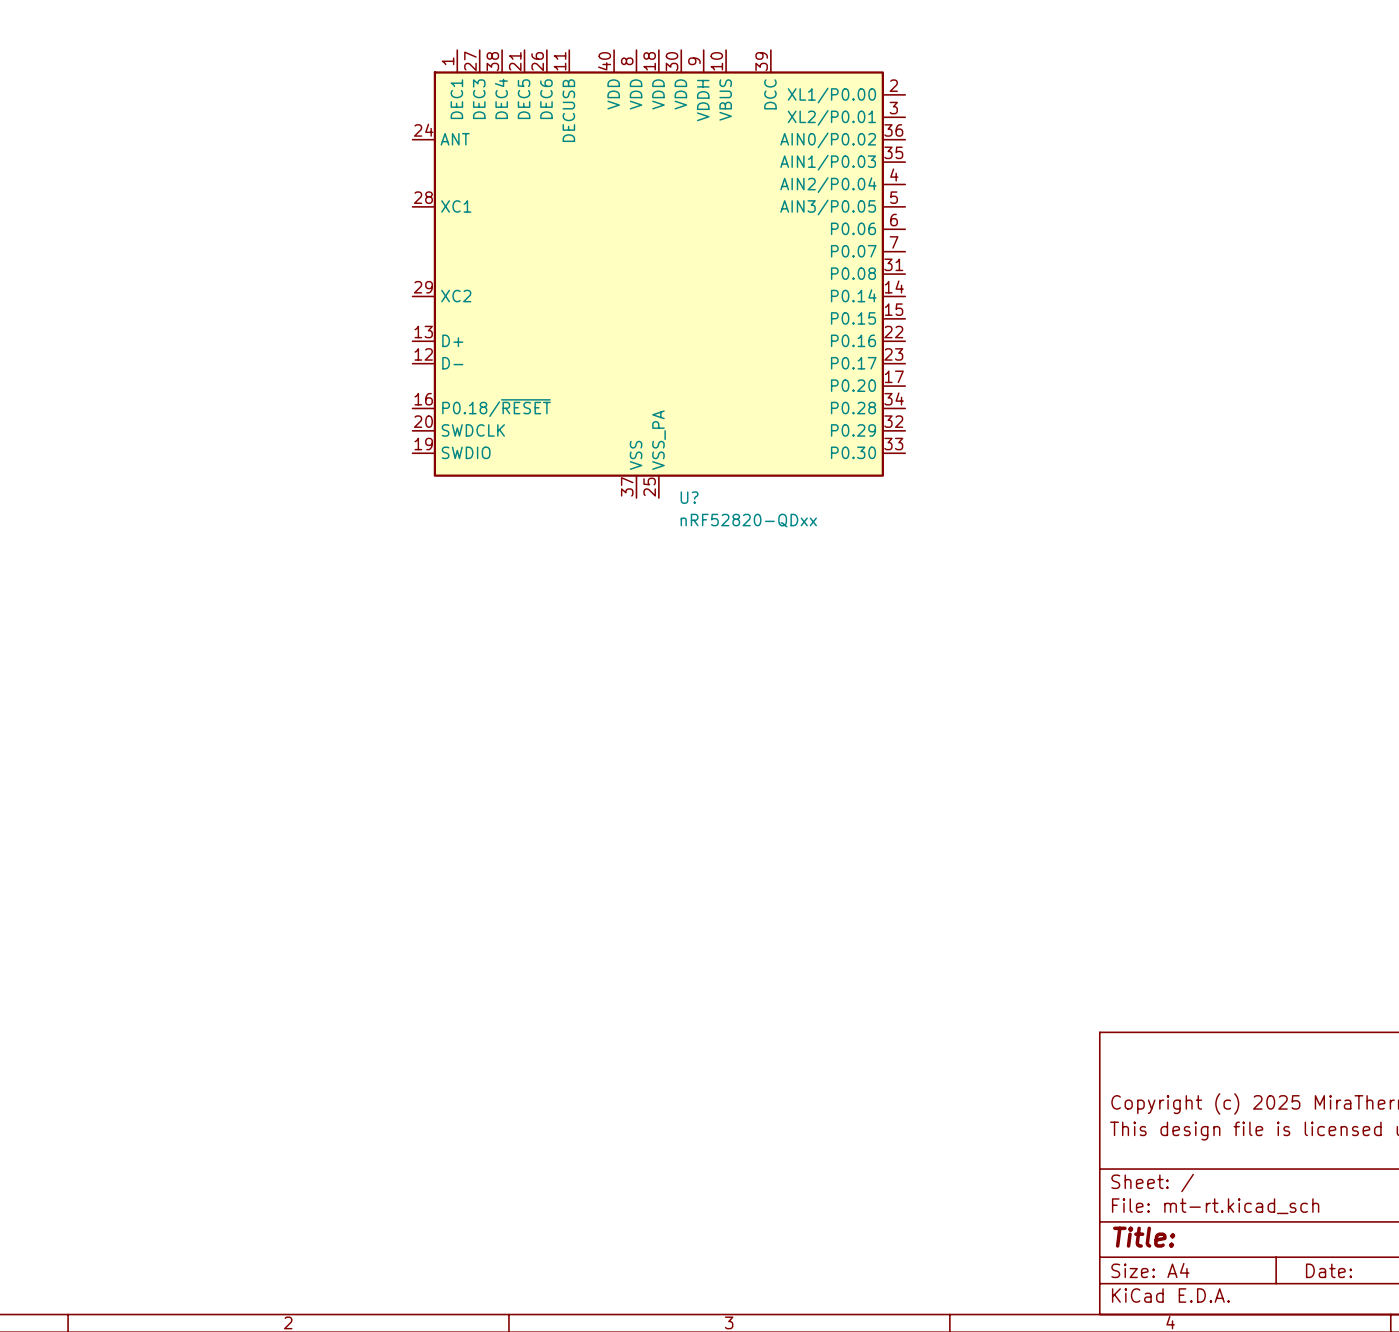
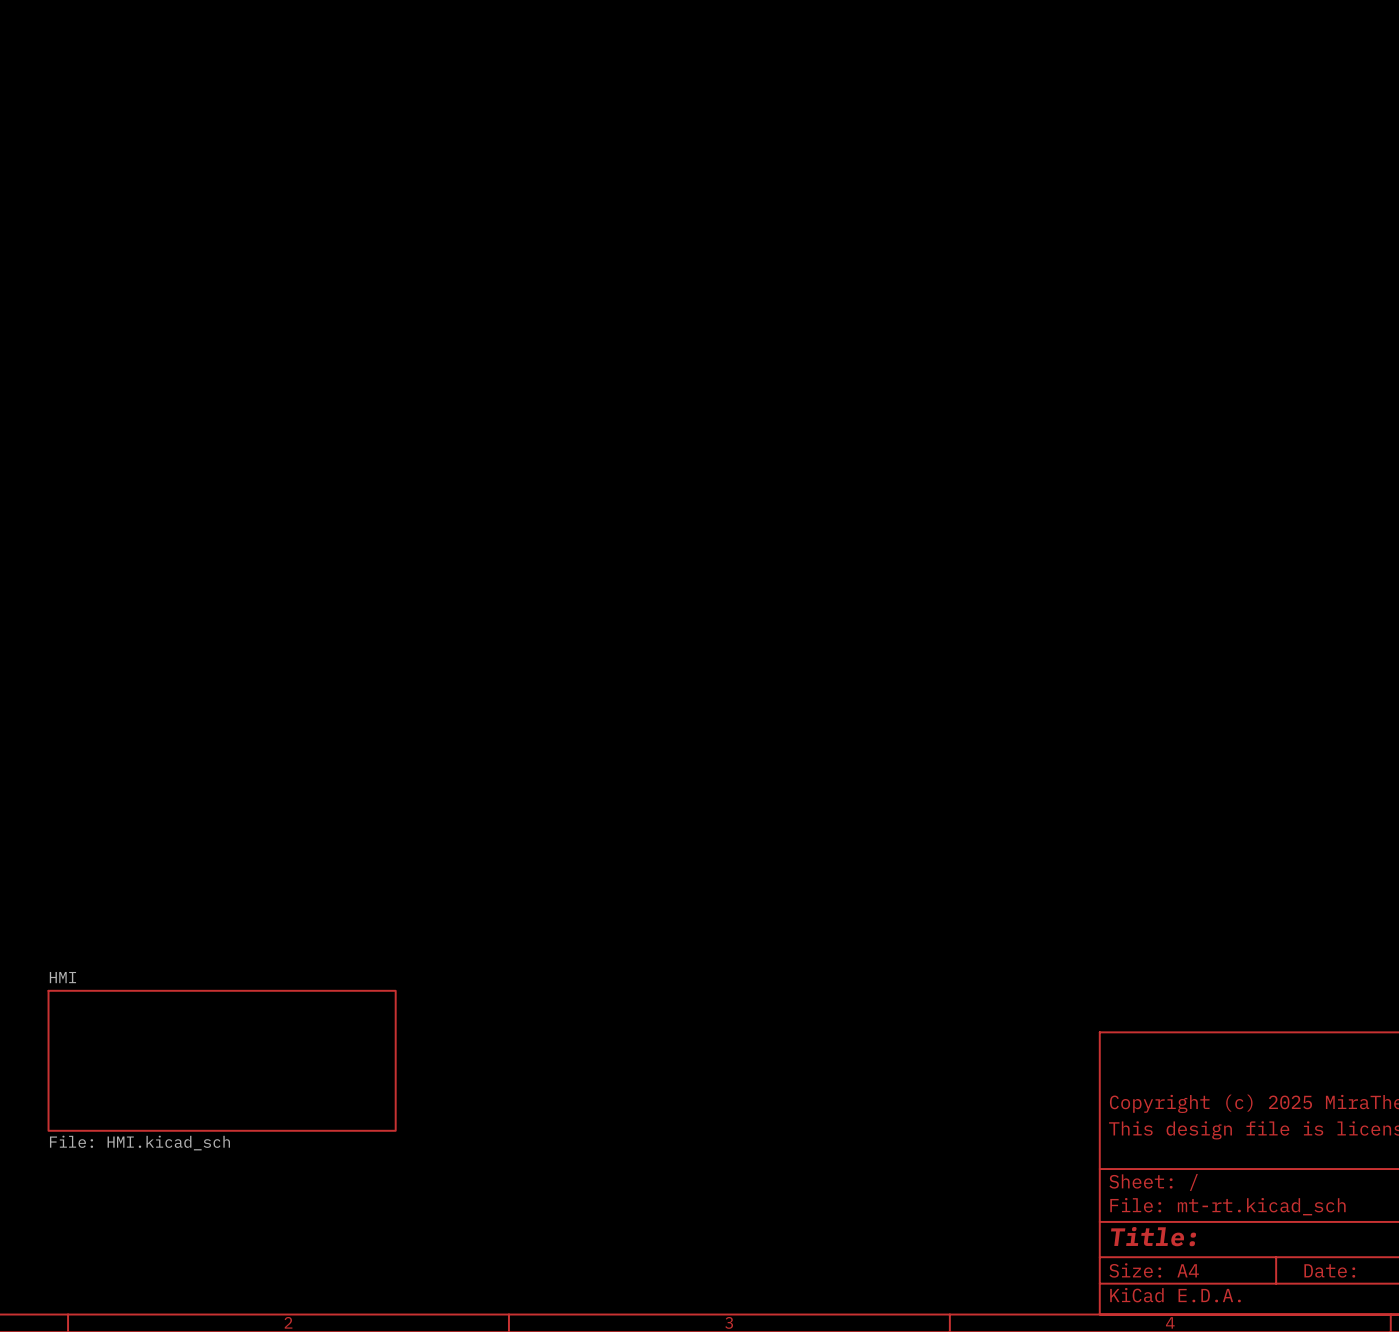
U?: nRF52820-QDxx (658, 274) -> none
sheet HMI: none -> File: HMI.kicad_sch (222, 1060)

